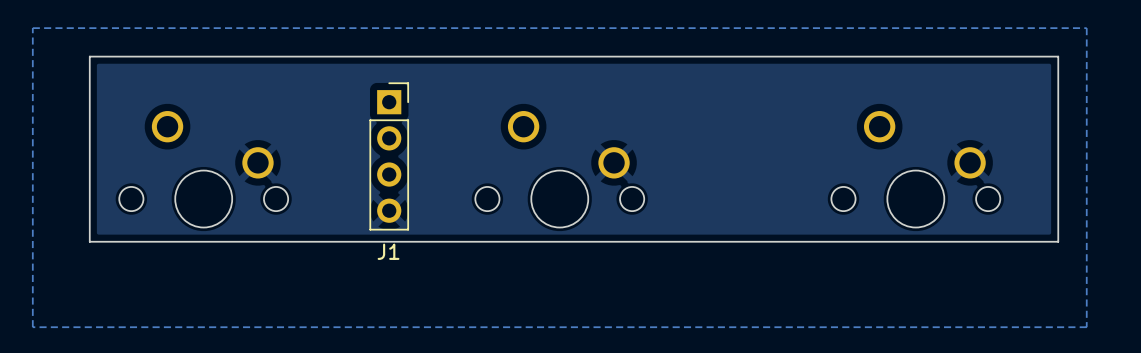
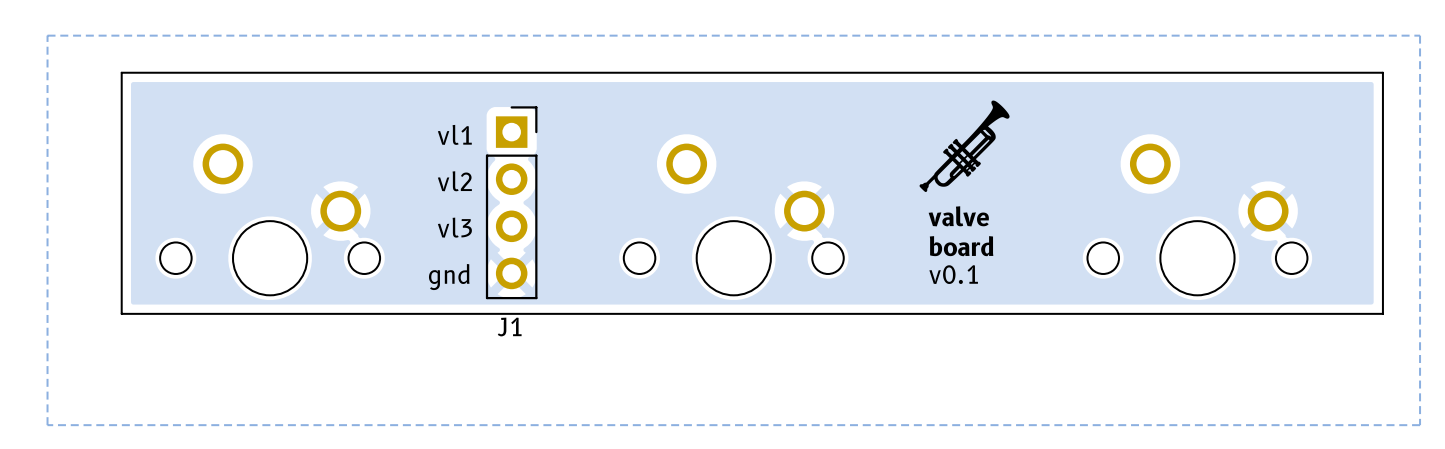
drawing: none -> [919, 100, 1010, 192]
text: none -> vl1 (454, 134)
text: none -> vl2 (454, 181)
text: none -> valve (958, 216)
text: none -> vl3 (454, 227)
text: none -> board (961, 246)
text: none -> v0.1 (953, 274)
text: none -> gnd (449, 277)

